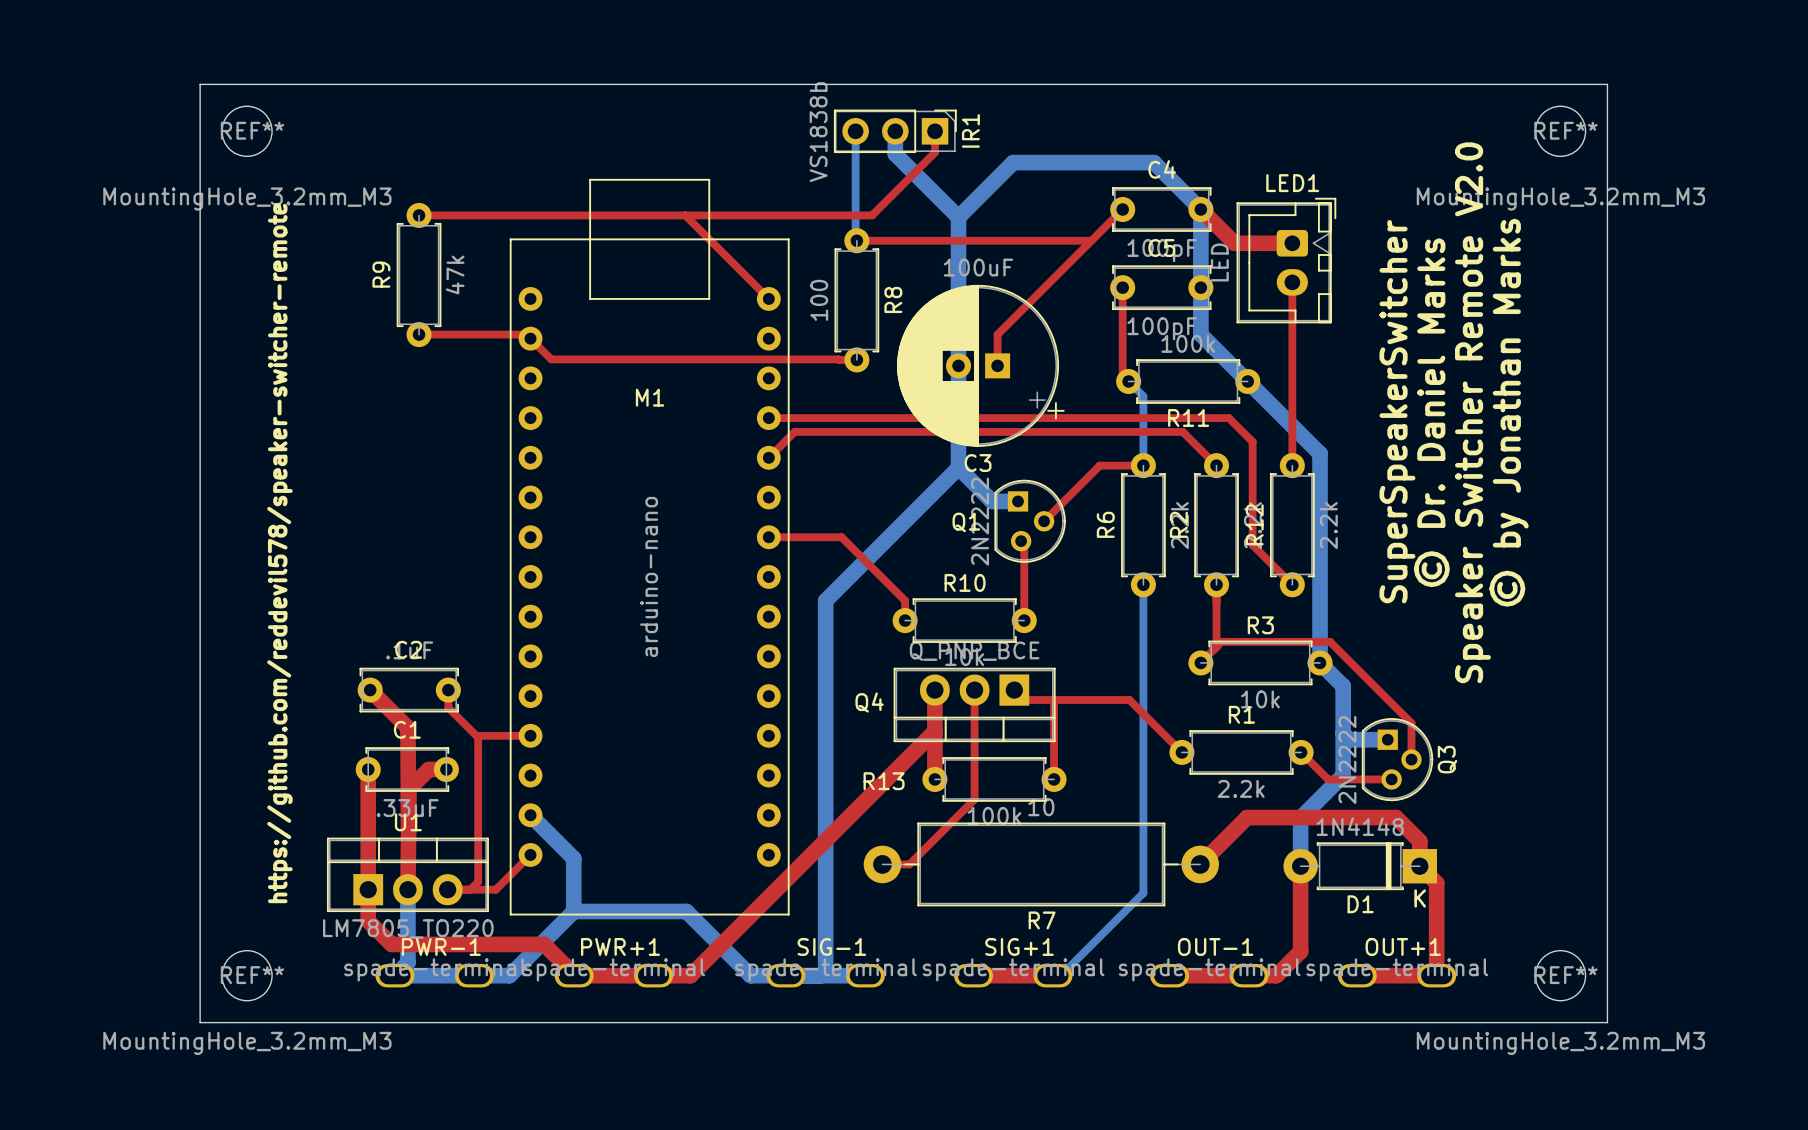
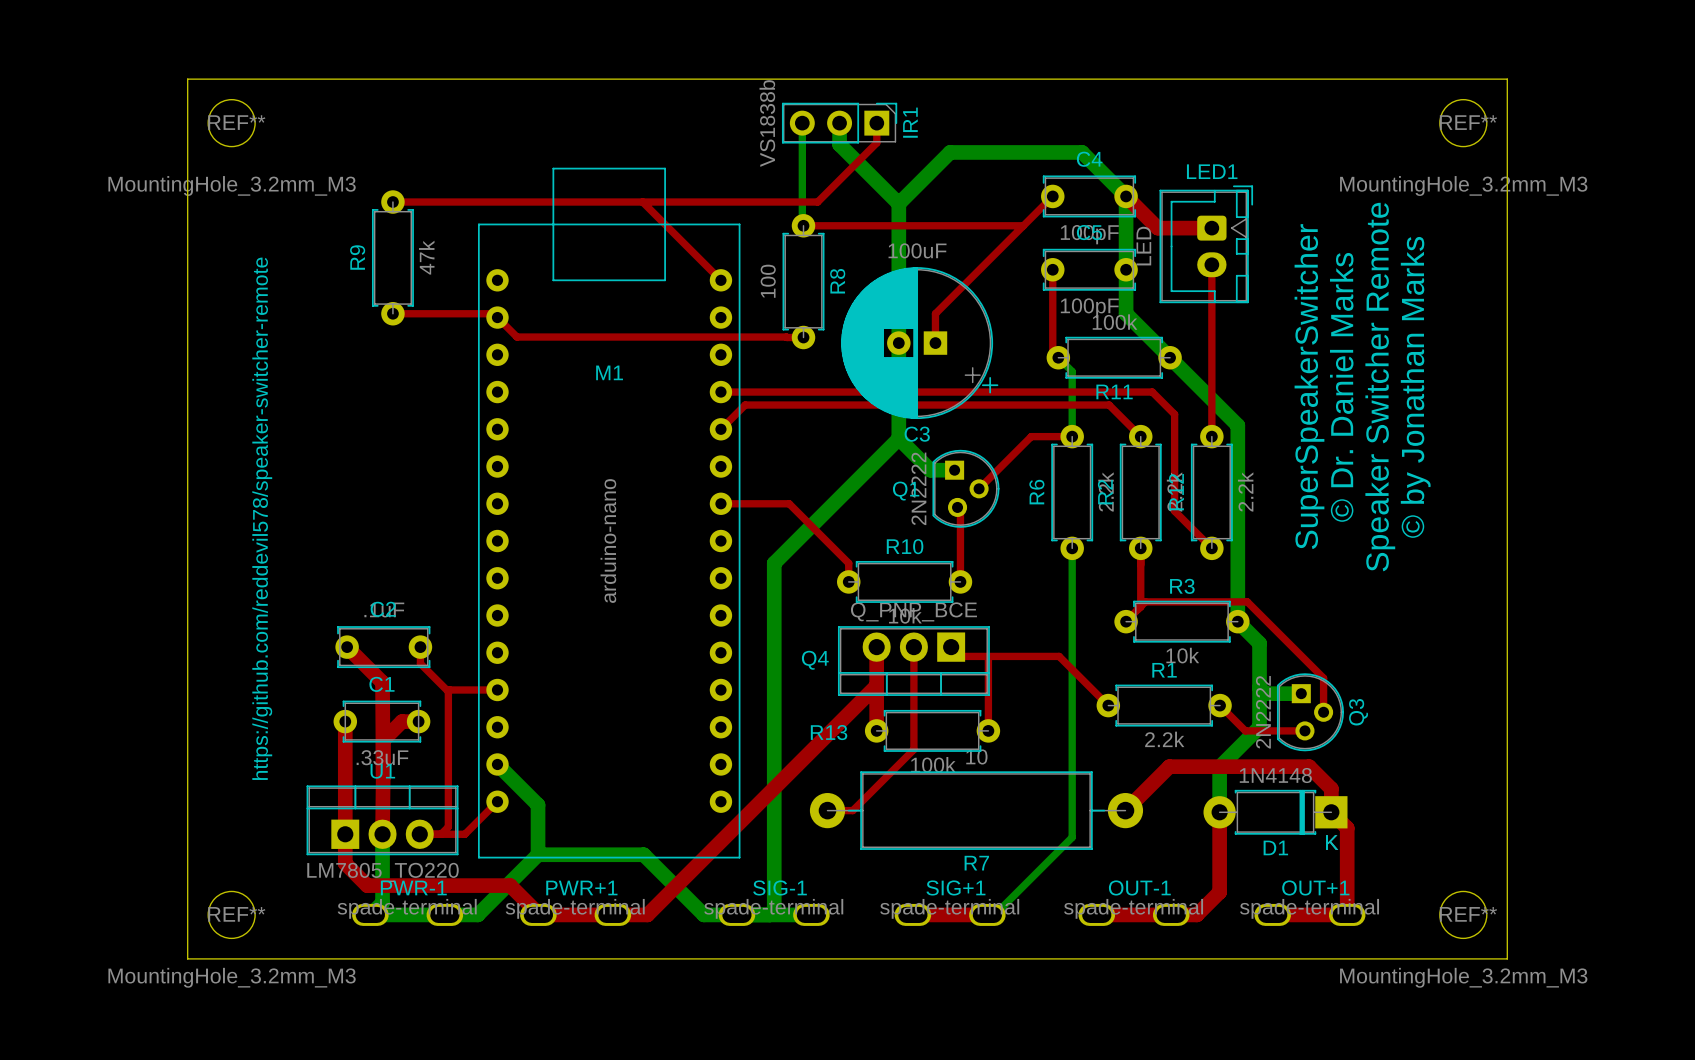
text: Speaker Switcher Remote V2.0 (1472, 412) -> Speaker Switcher Remote (1380, 387)

